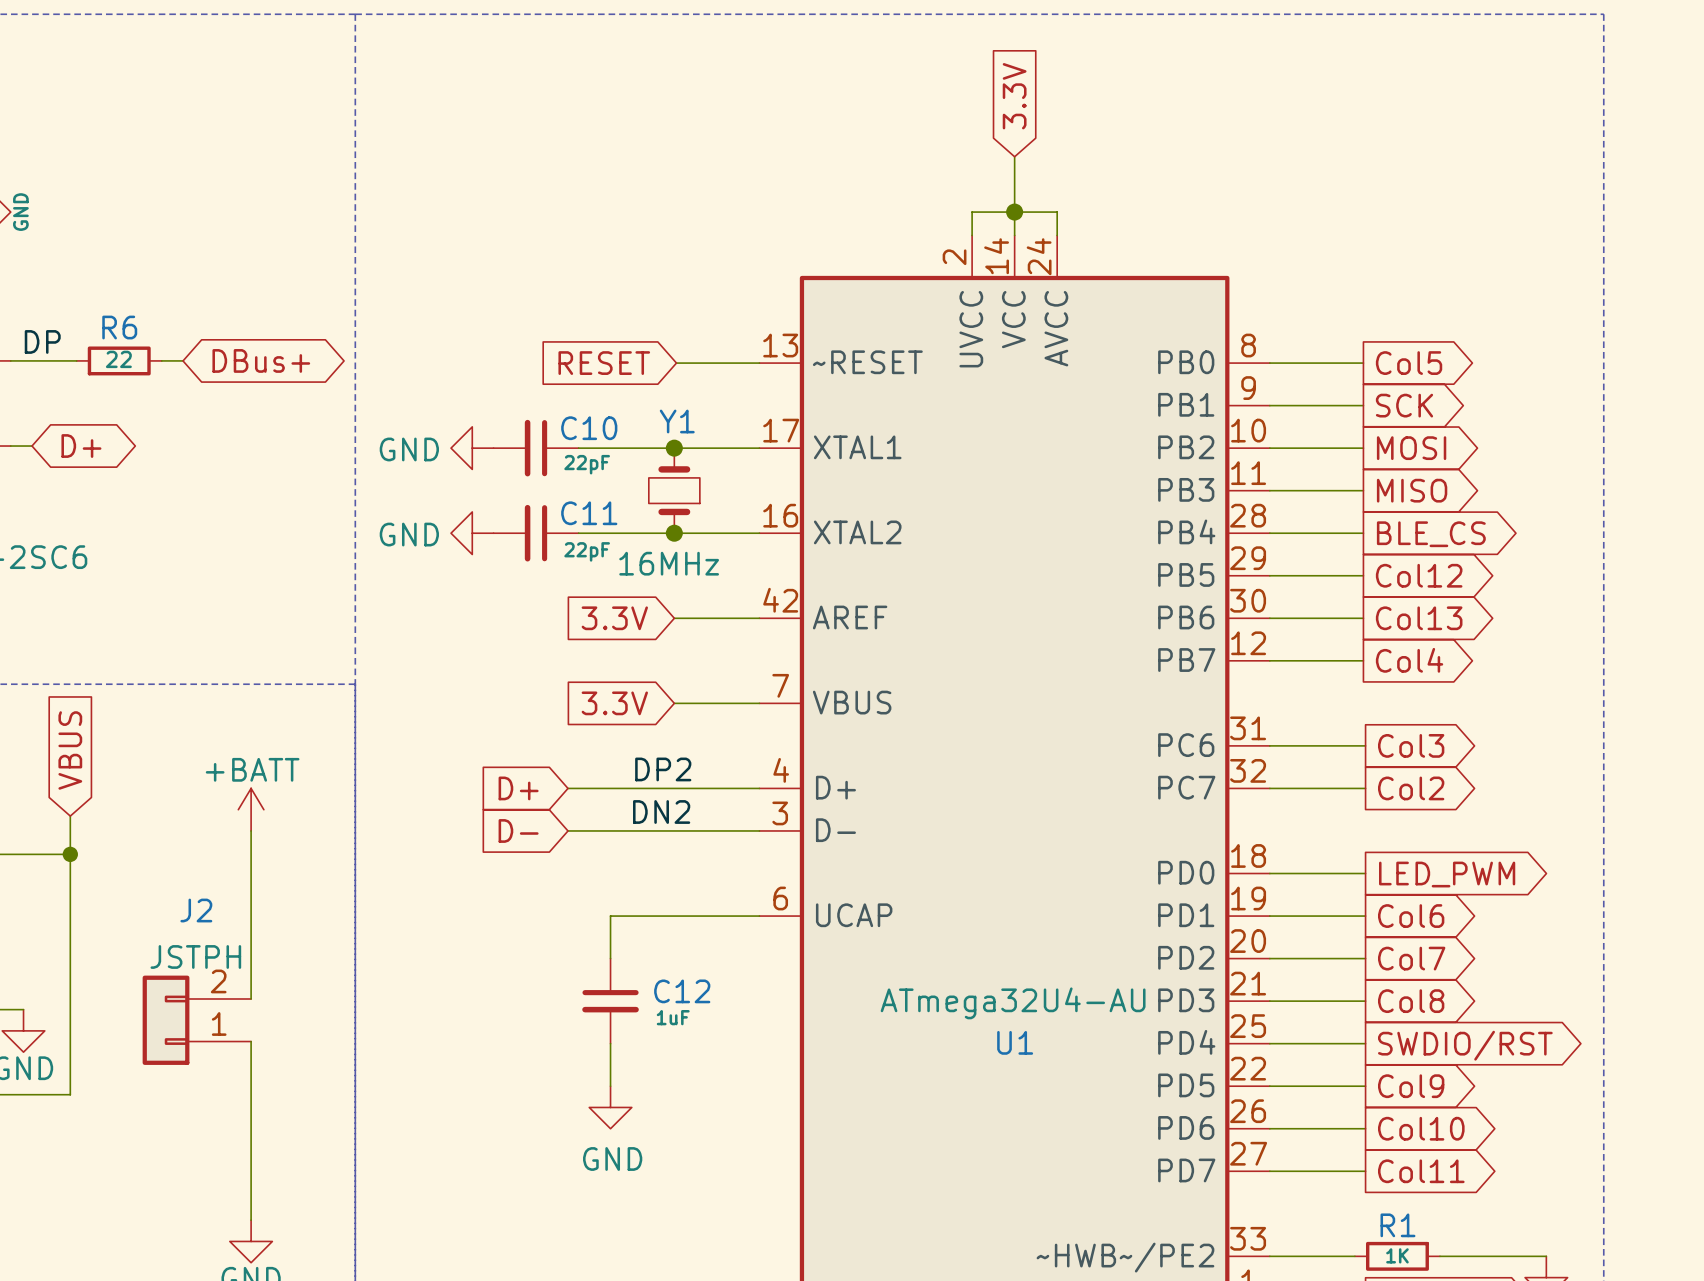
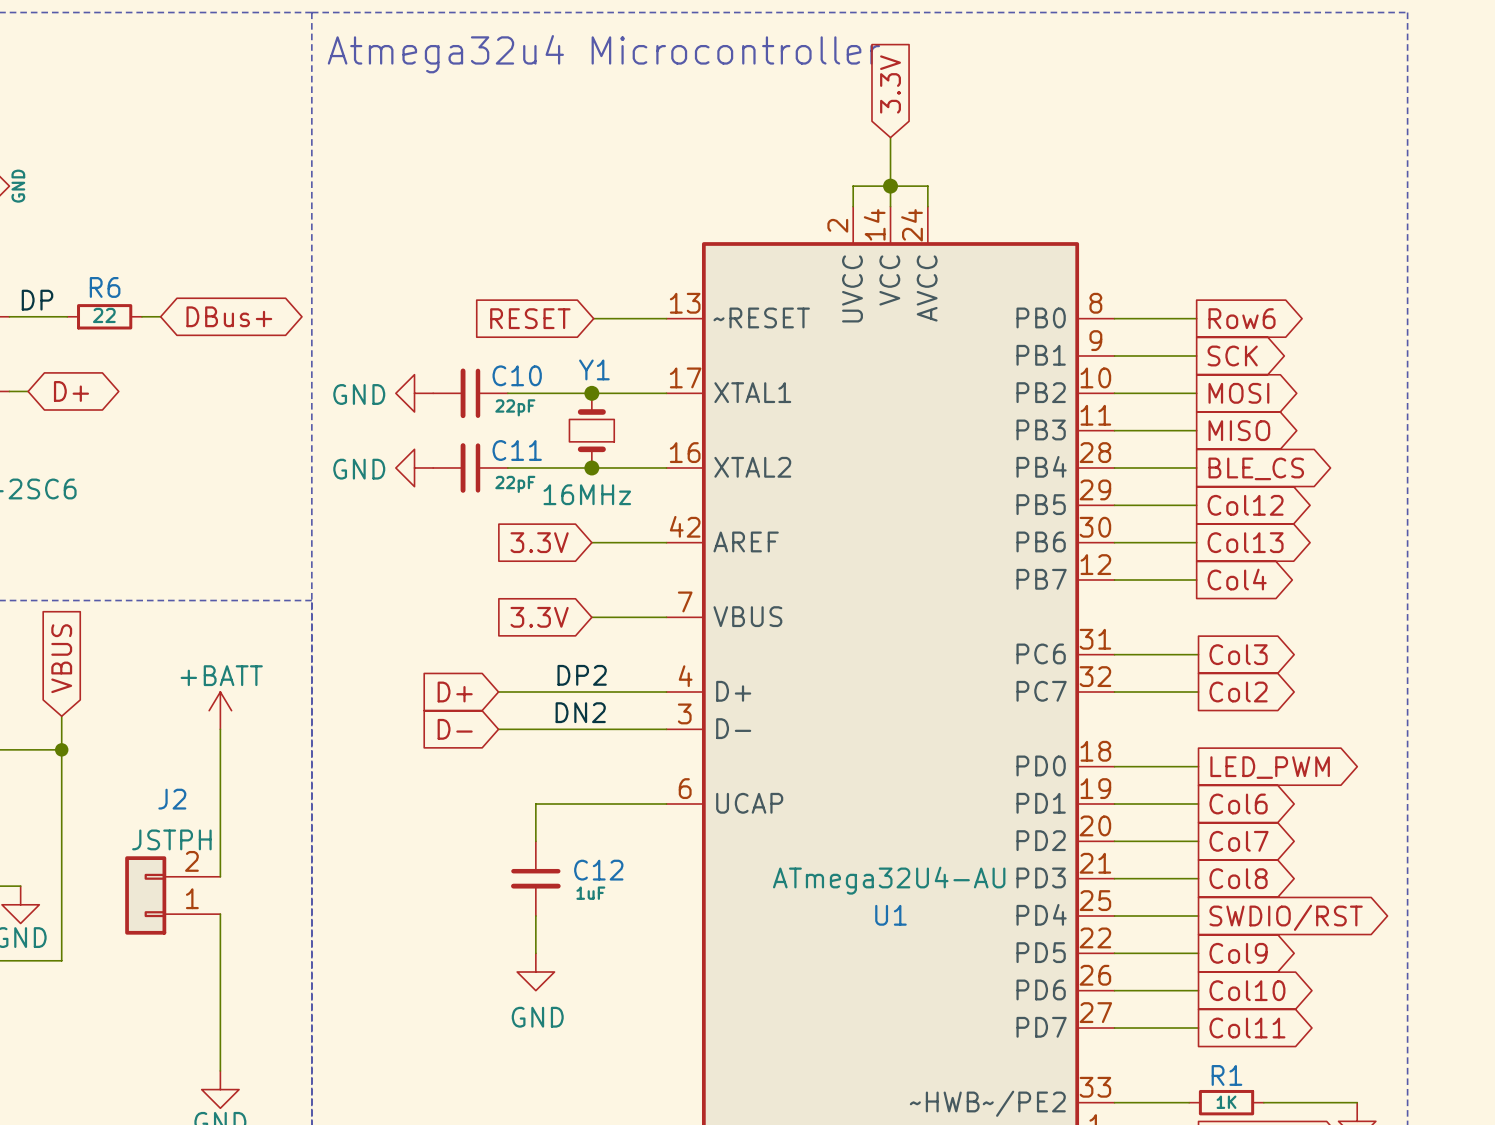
text: none -> Atmega32u4 Microcontroller (603, 54)
global label: Col5 (1409, 363) -> Row6 (1242, 318)

